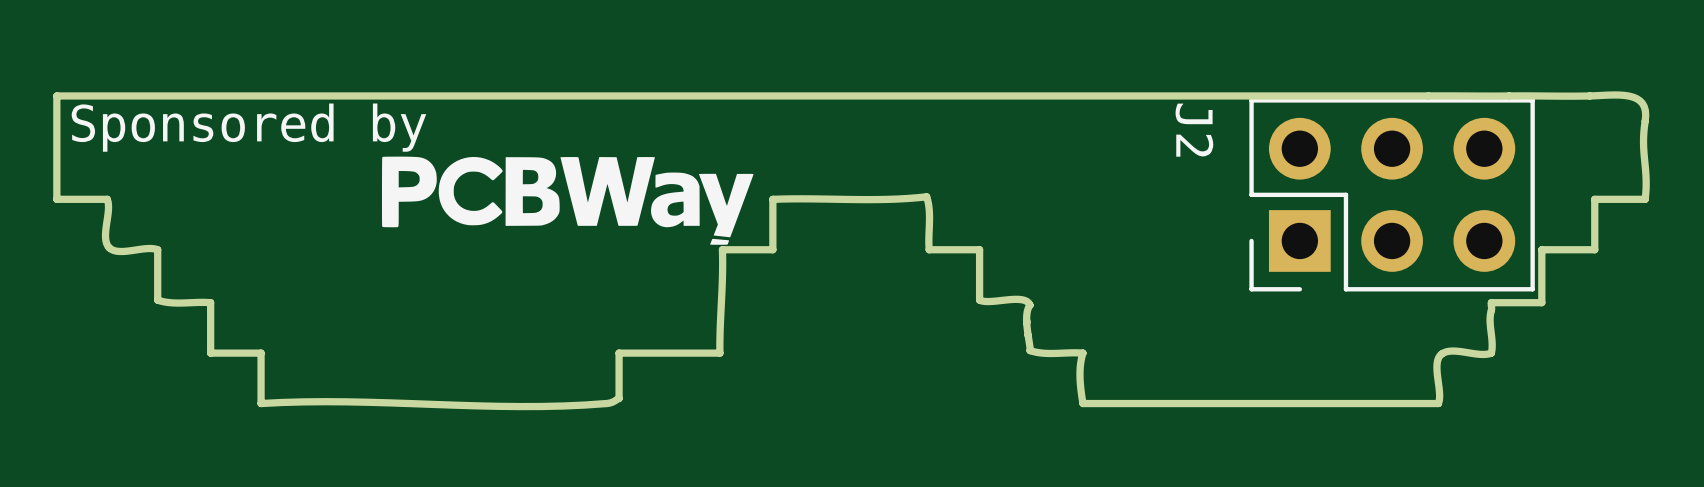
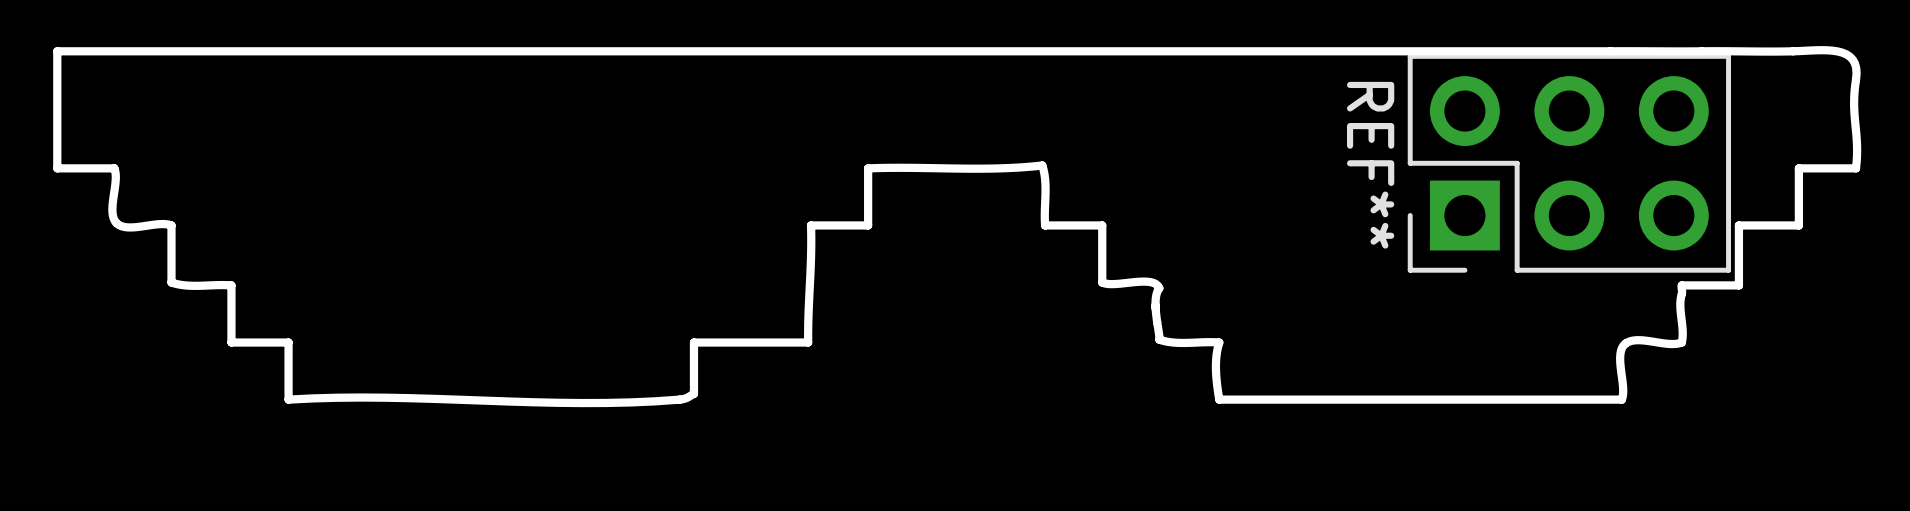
text: Sponsored by (248, 127) -> none
J2 name: J2 (1194, 130) -> REF** (1370, 165)
drawing: [381, 156, 754, 245] -> none

